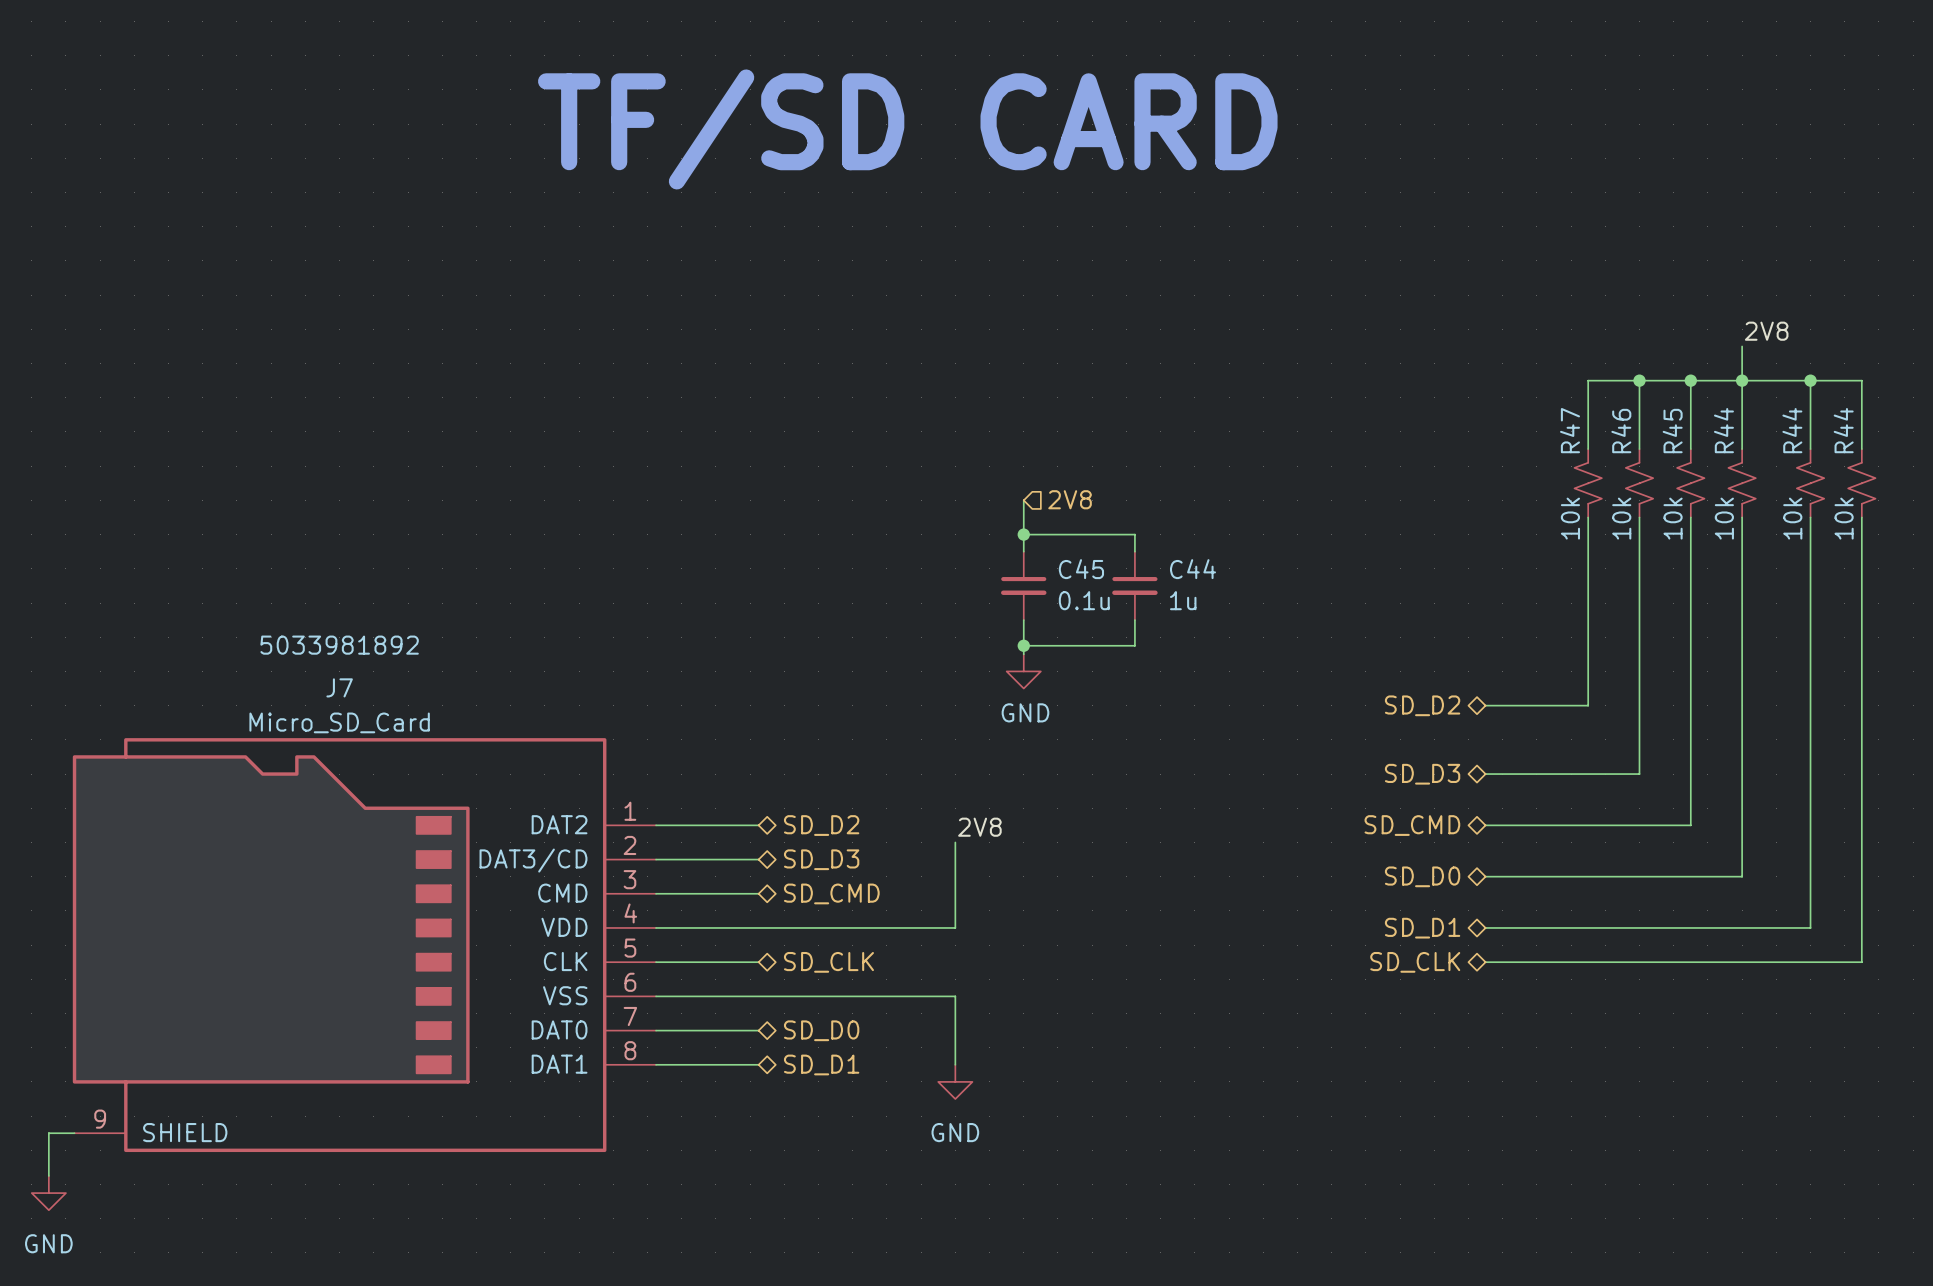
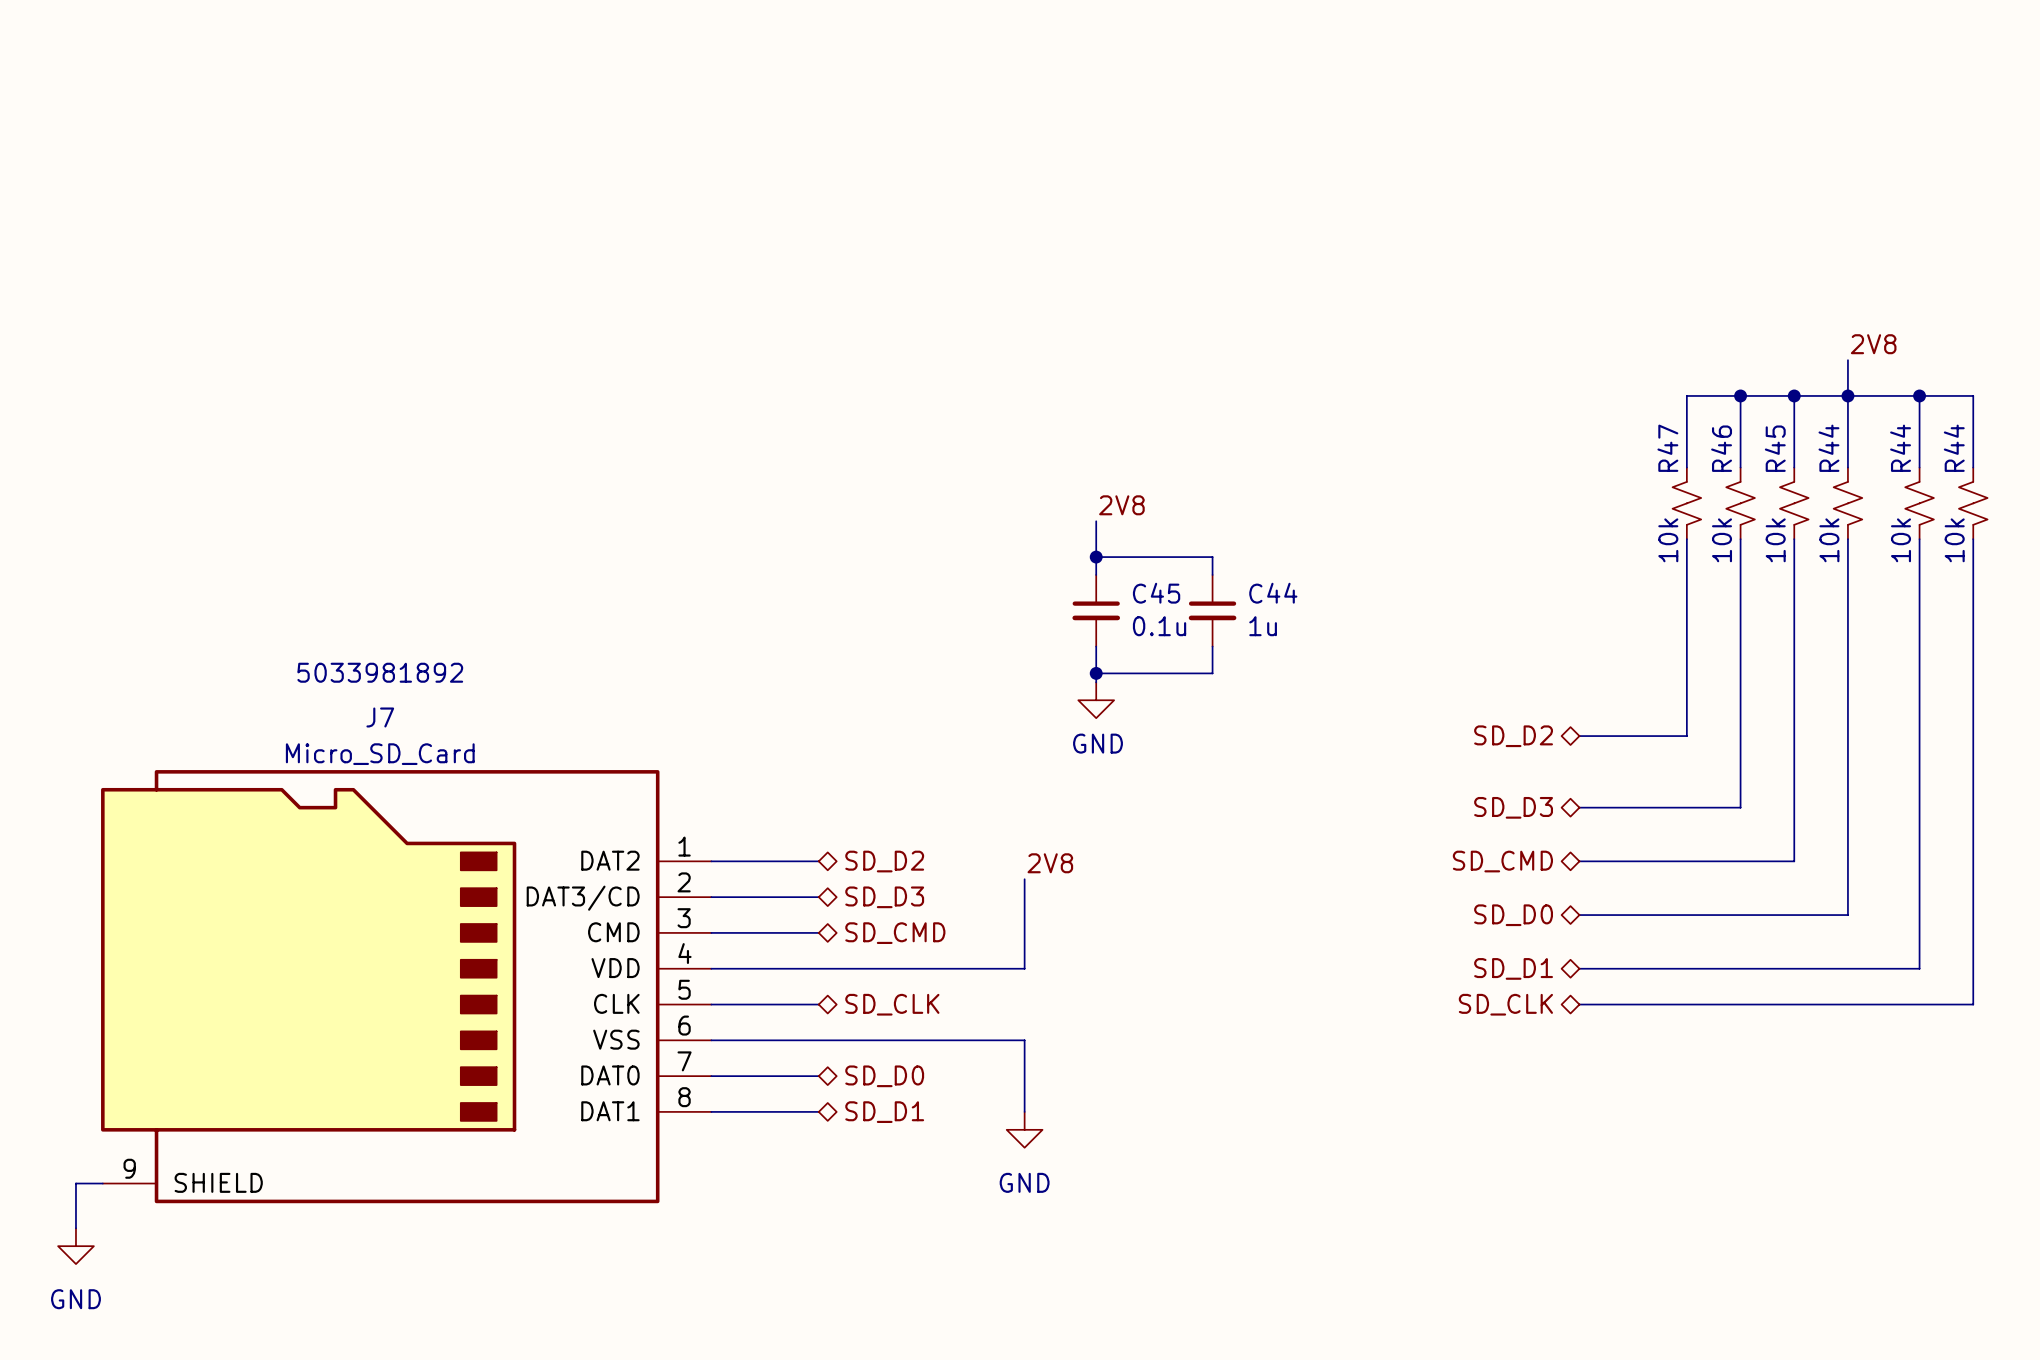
text: TF/SD CARD (907, 129) -> none
label: none -> 2V8 (1121, 505)
hierarchical label: 2V8 (1070, 499) -> none

